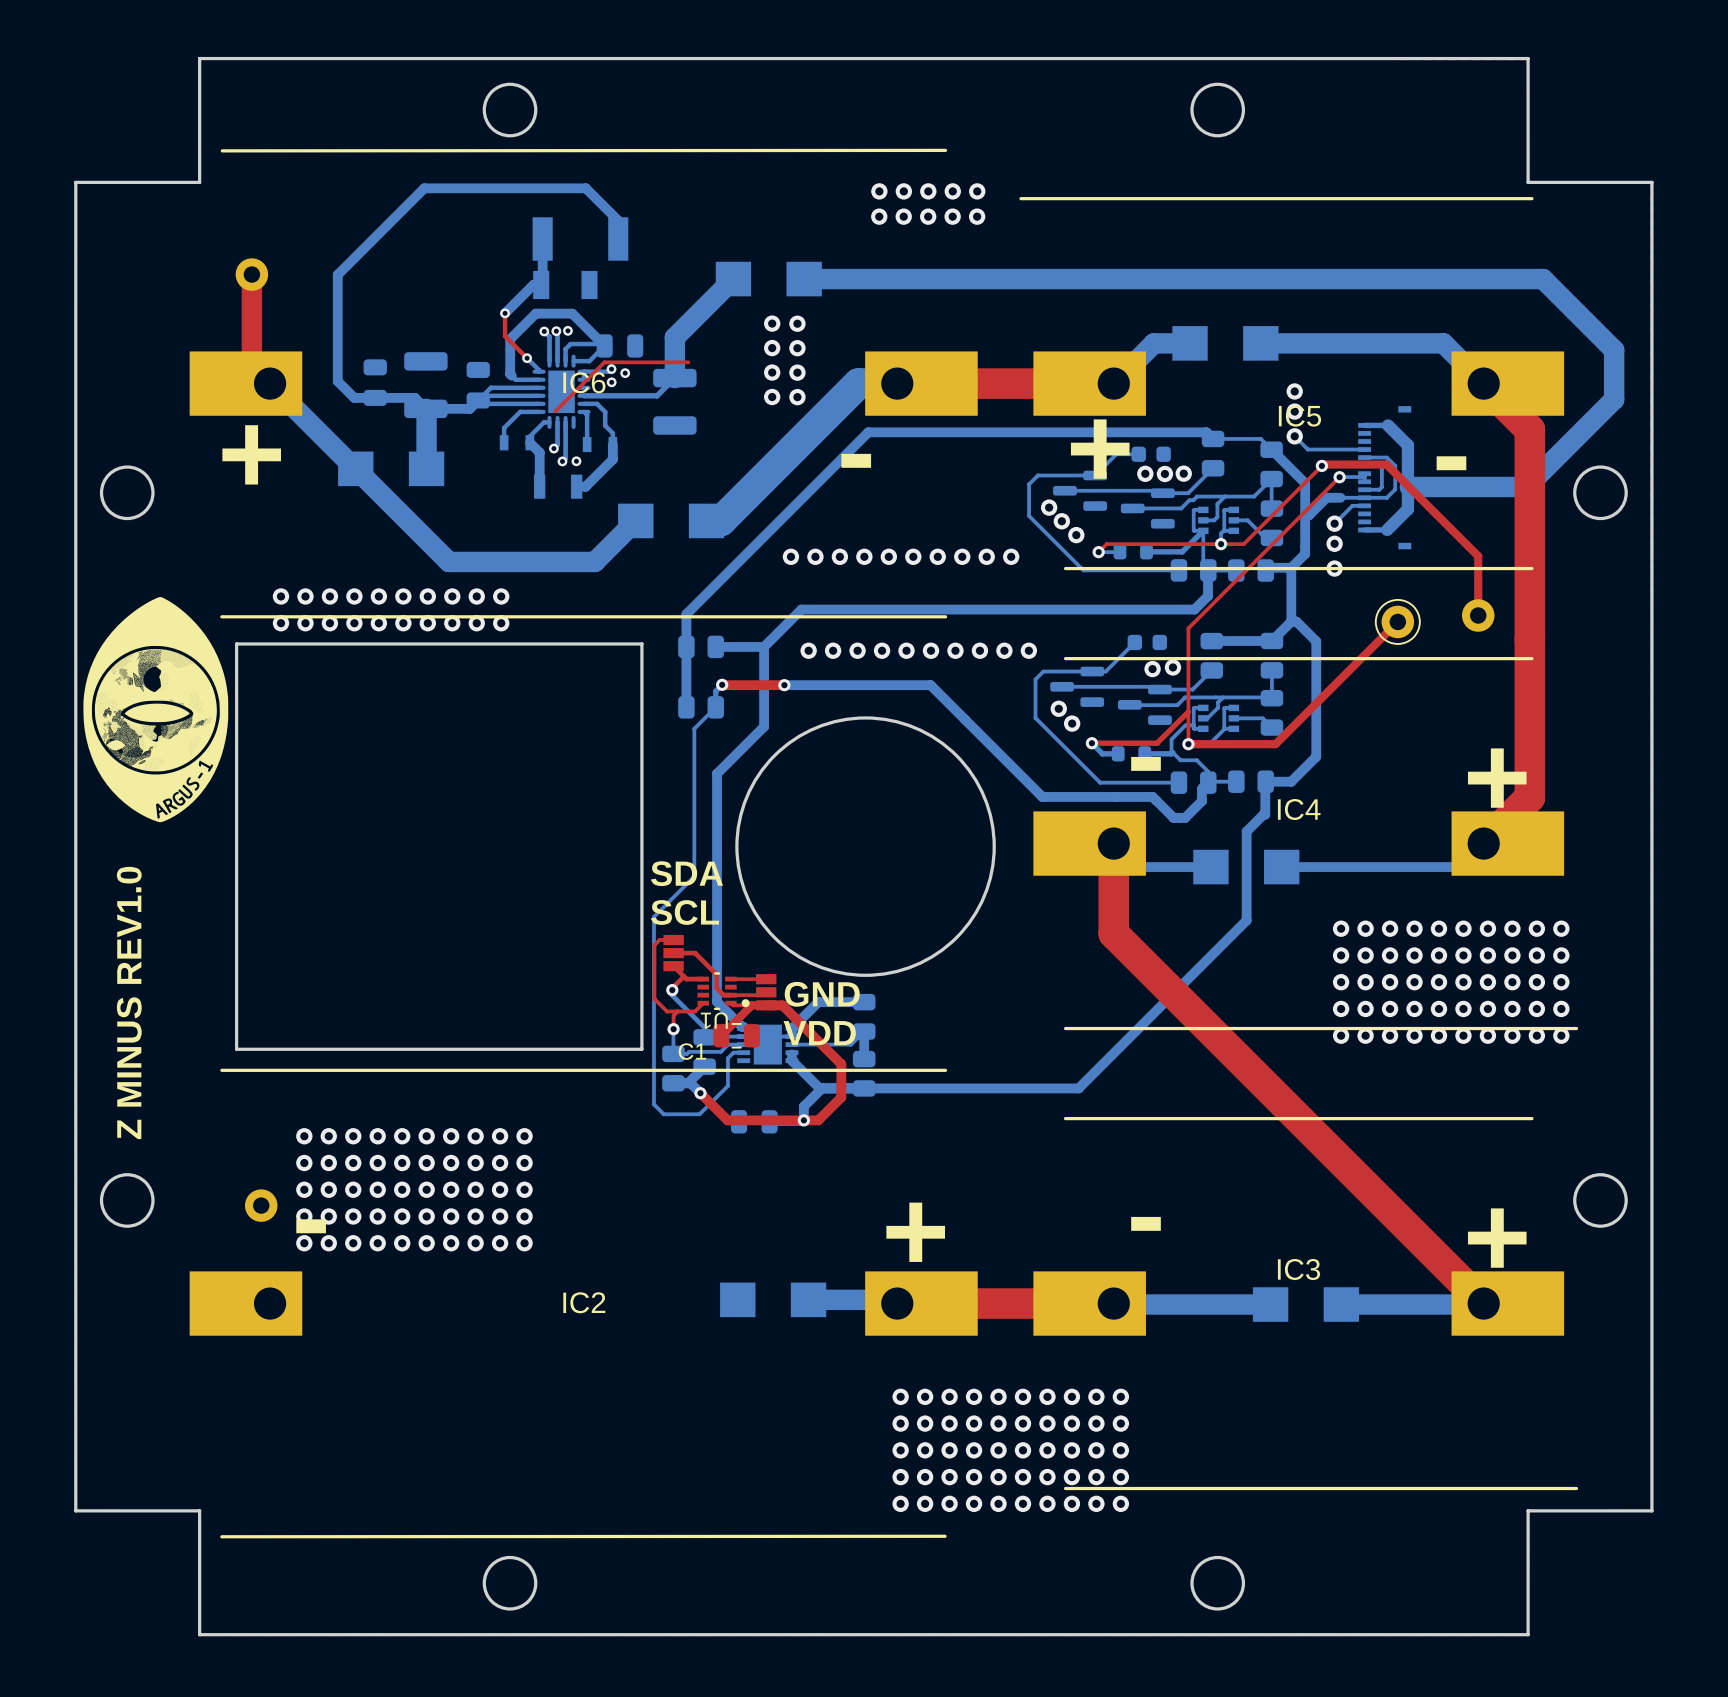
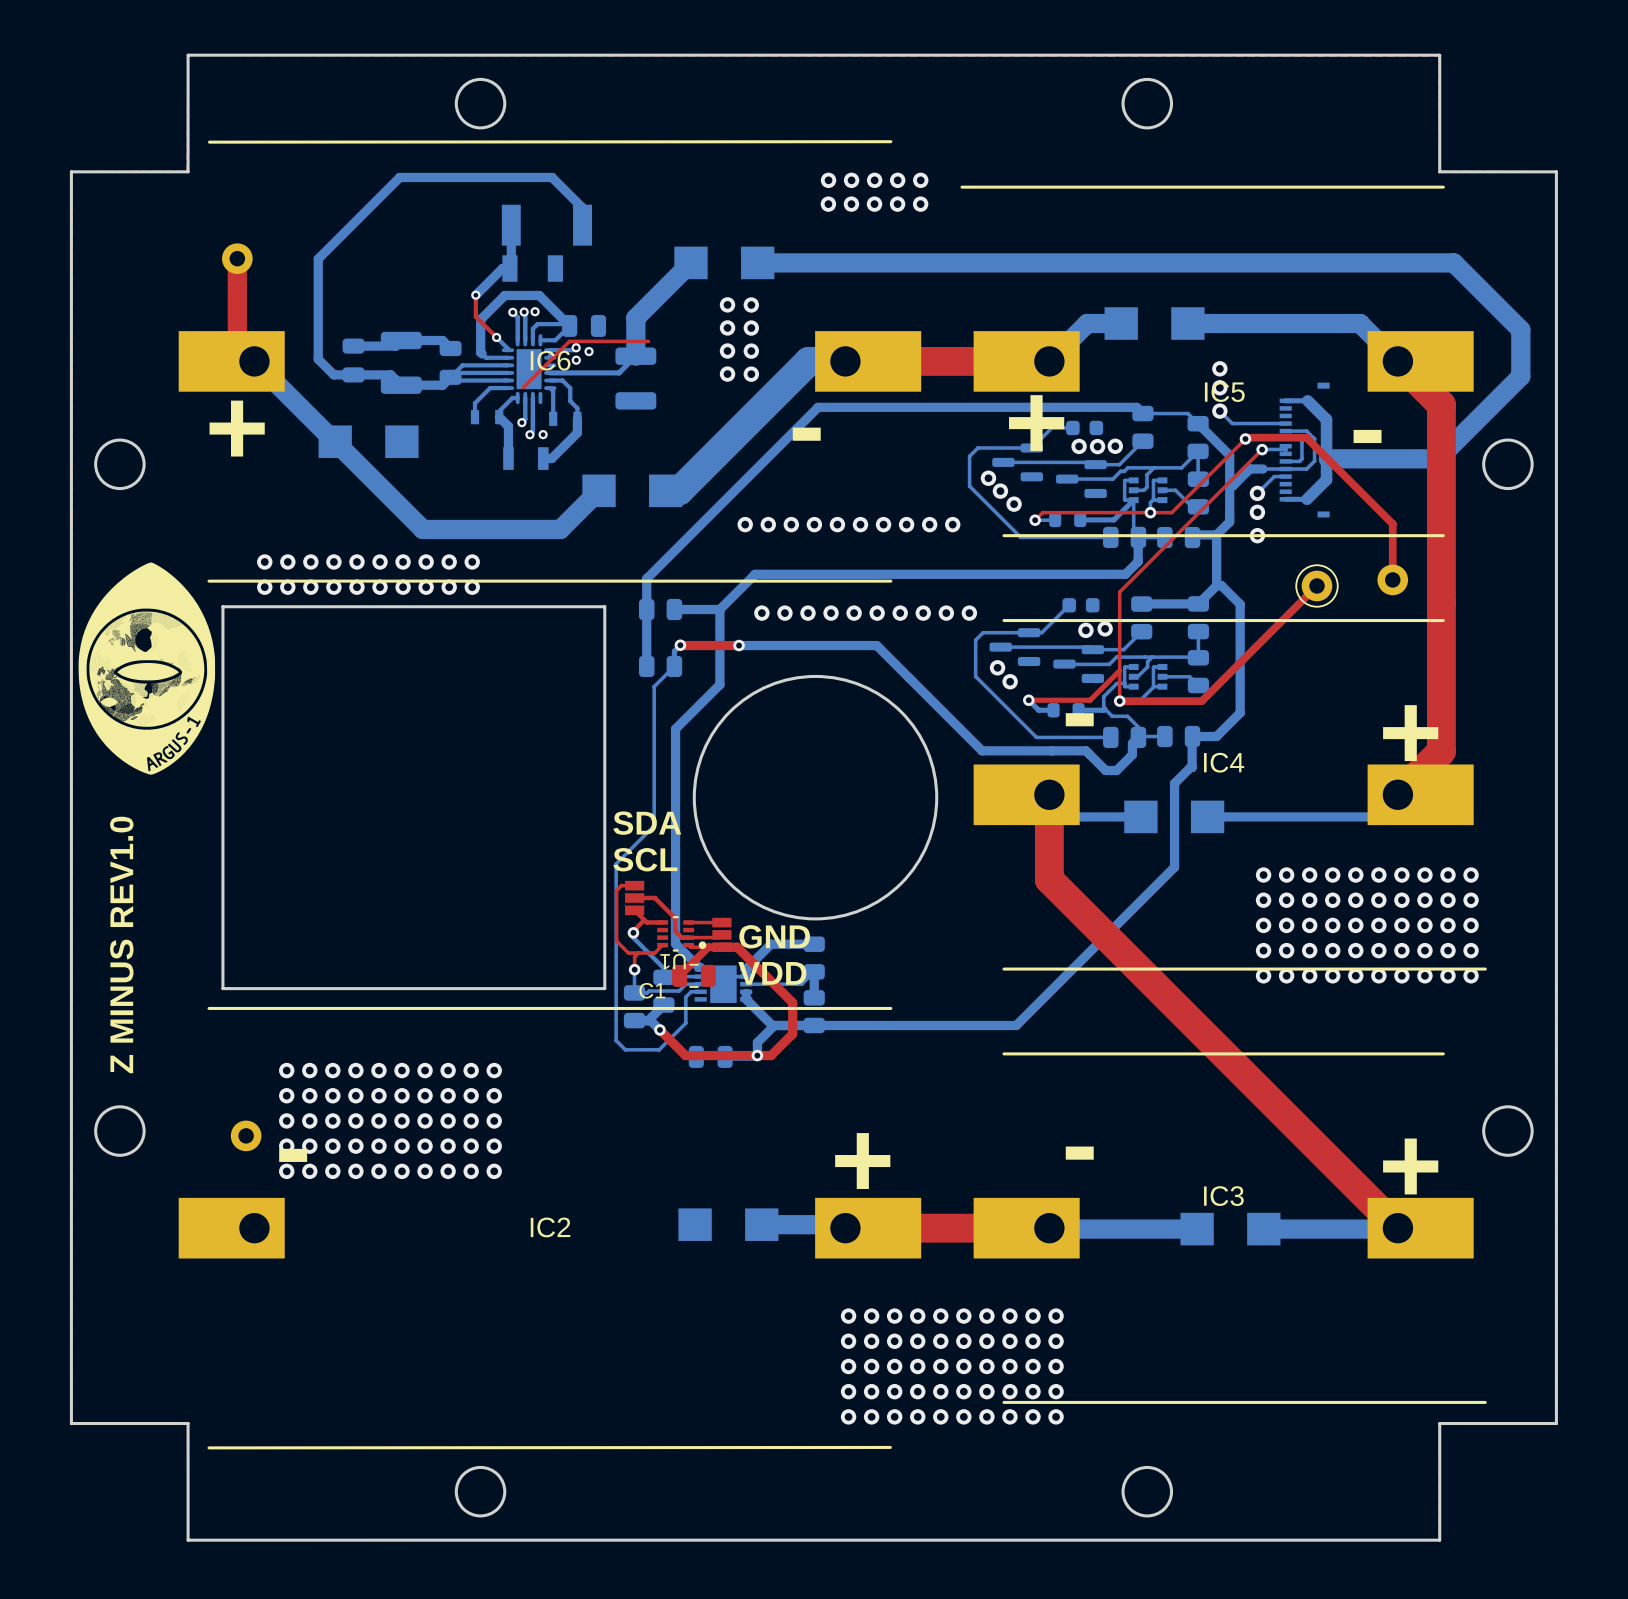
bottom track: none -> (353, 346) (395, 346) (401, 340) (442, 340) (450, 348)
bottom track: (425, 408) (426, 468) -> none

